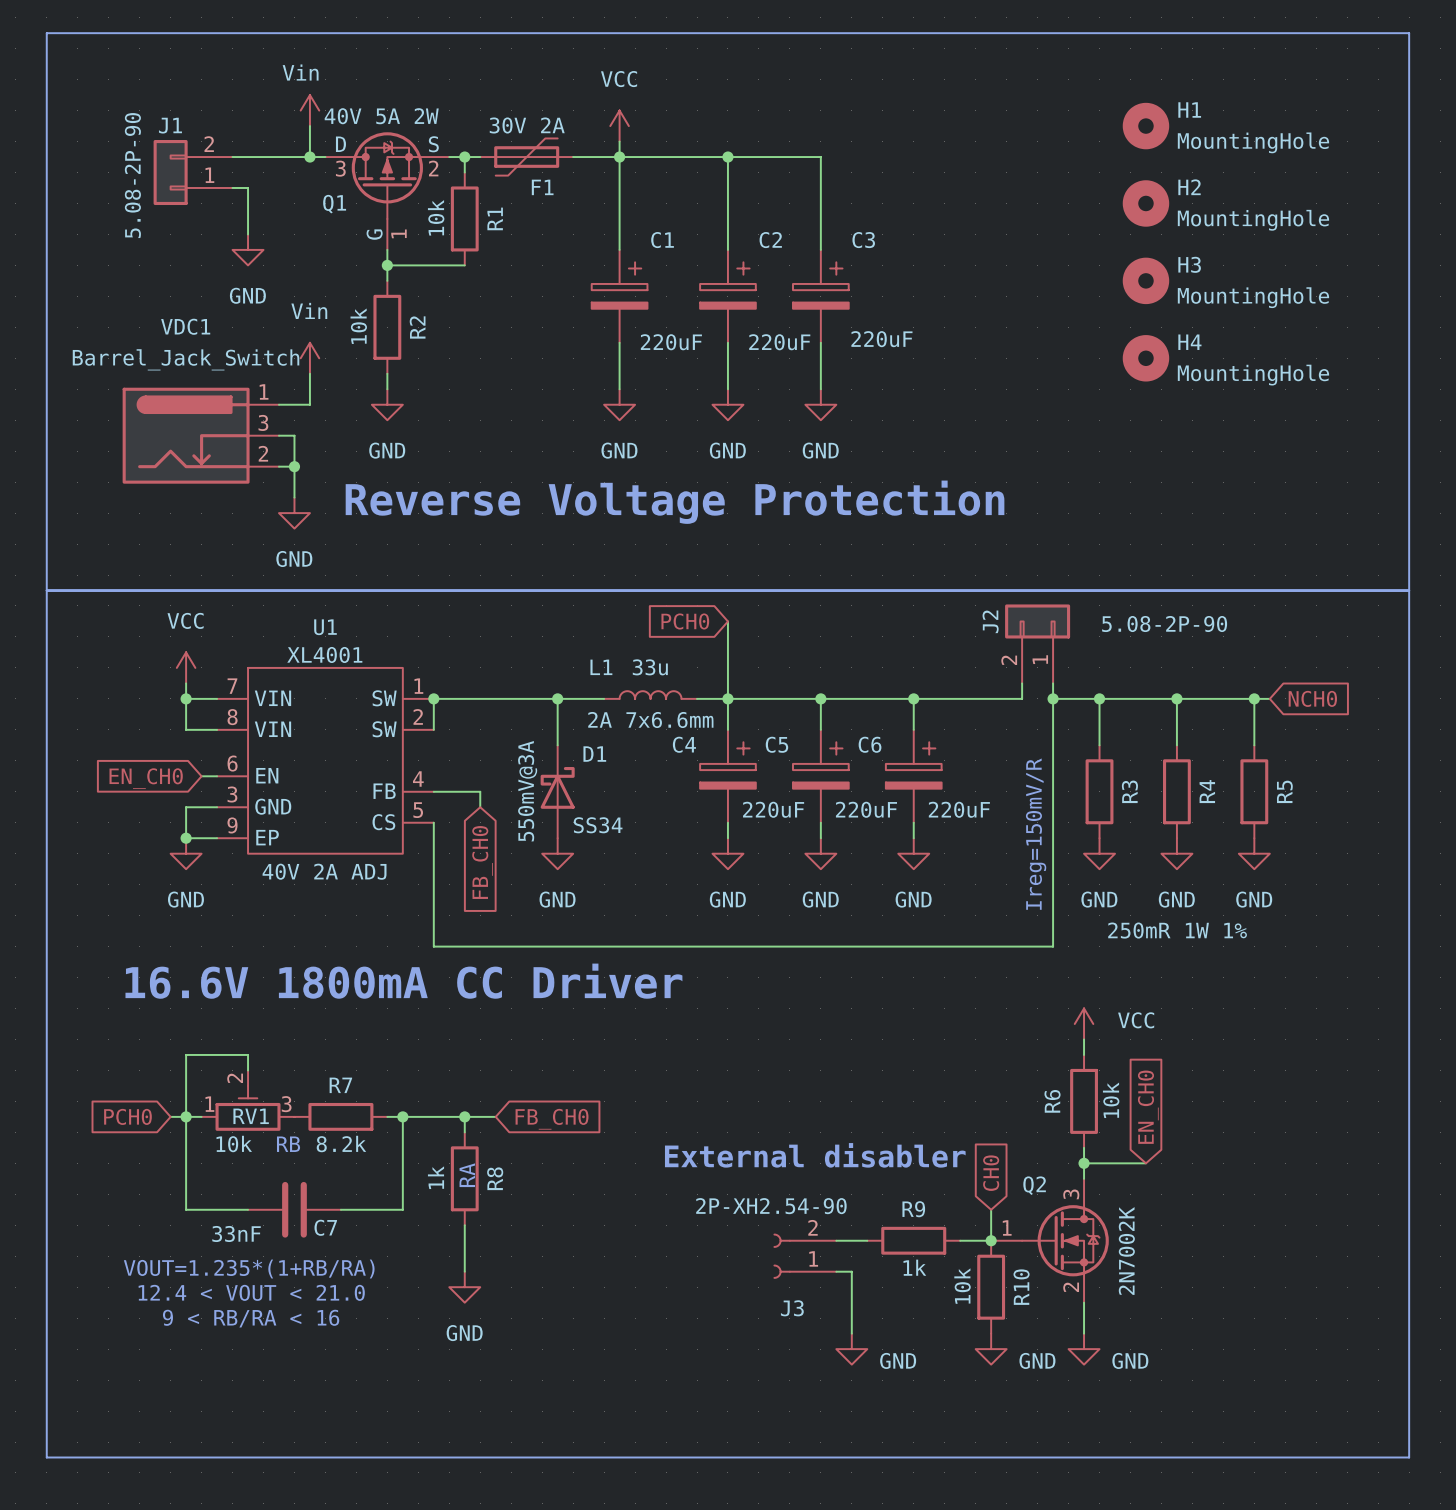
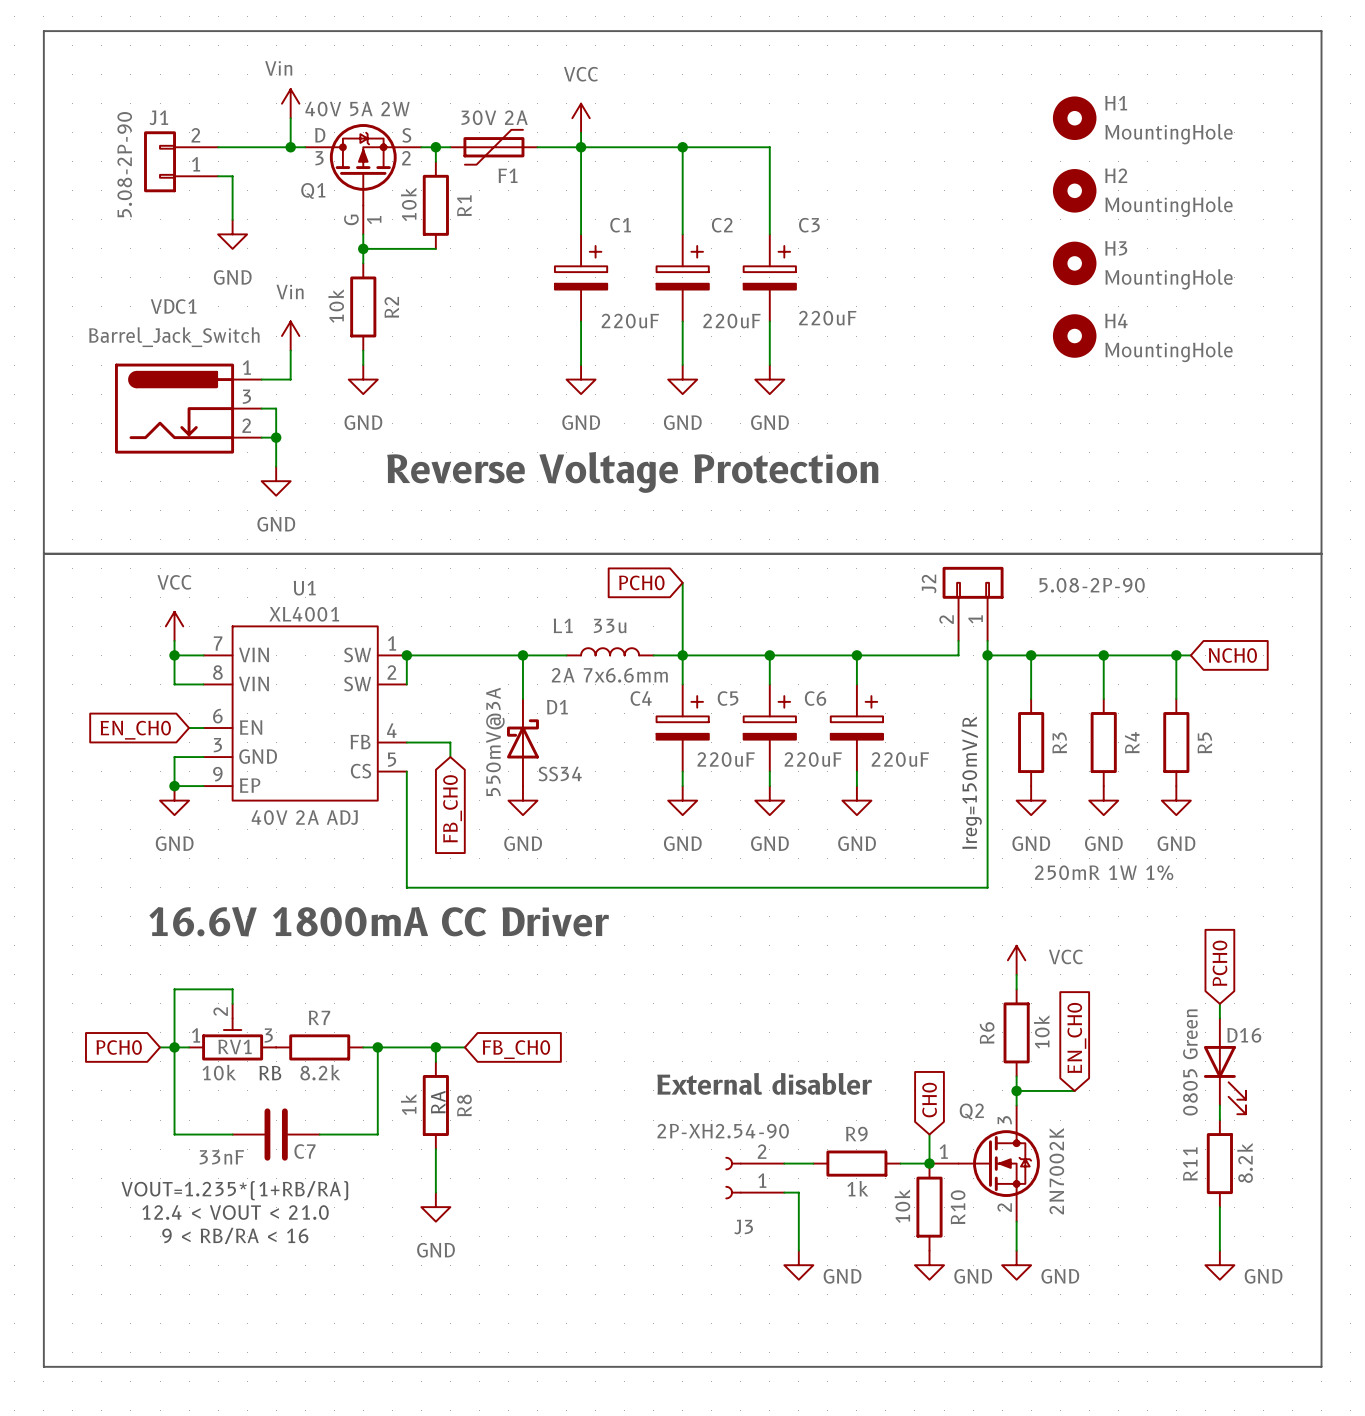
global label: none -> PCH0 (1219, 963)
wire: none -> (1219, 1003) (1219, 1018)
D16: none -> (1224, 1066)
wire: none -> (1219, 1105) (1219, 1120)
R11: none -> 8.2k (1219, 1163)
wire: none -> (1219, 1207) (1219, 1250)
power symbol: none -> GND (1219, 1265)

